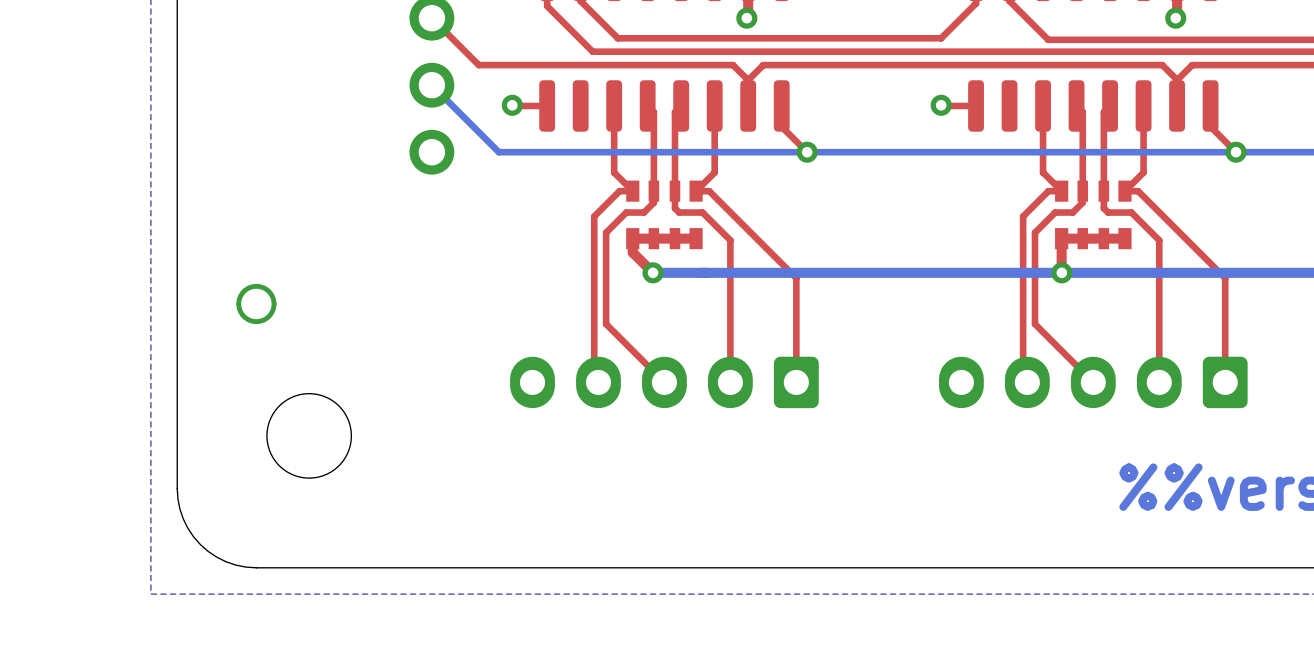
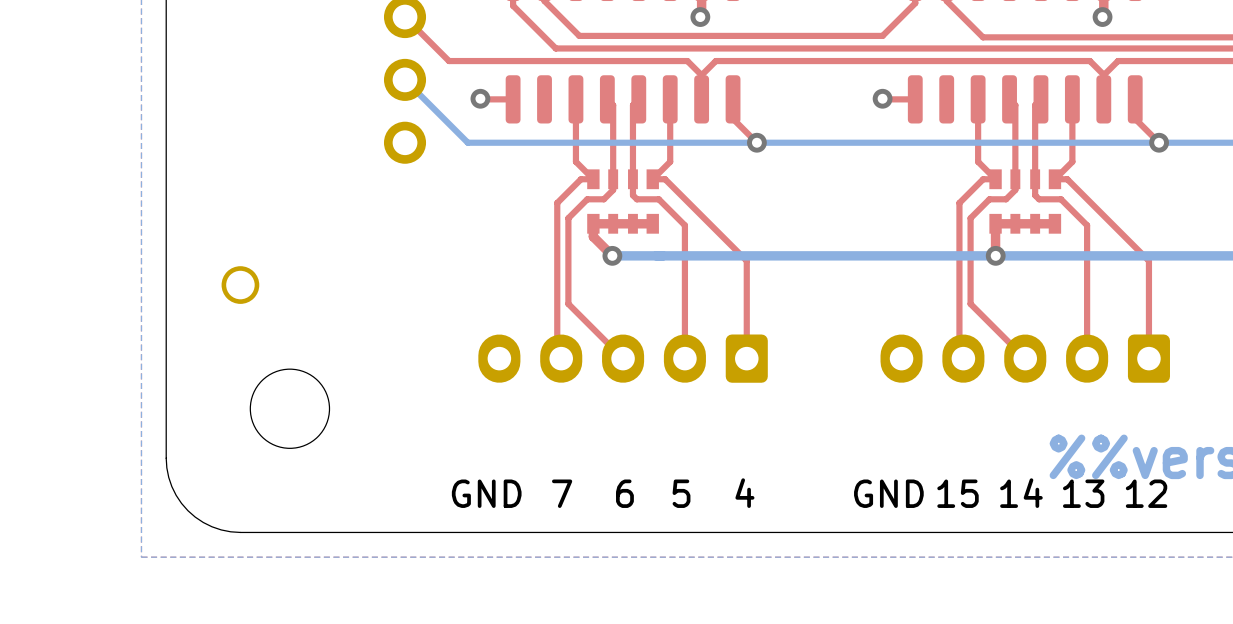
text: none -> 4 (744, 493)
text: none -> 14 (1021, 493)
text: none -> GND (486, 493)
text: none -> 7 (562, 493)
text: none -> 6 (624, 493)
text: none -> 5 (681, 493)
text: none -> GND (888, 493)
text: none -> 15 (958, 493)
text: none -> 13 (1083, 493)
text: none -> 12 (1146, 493)

